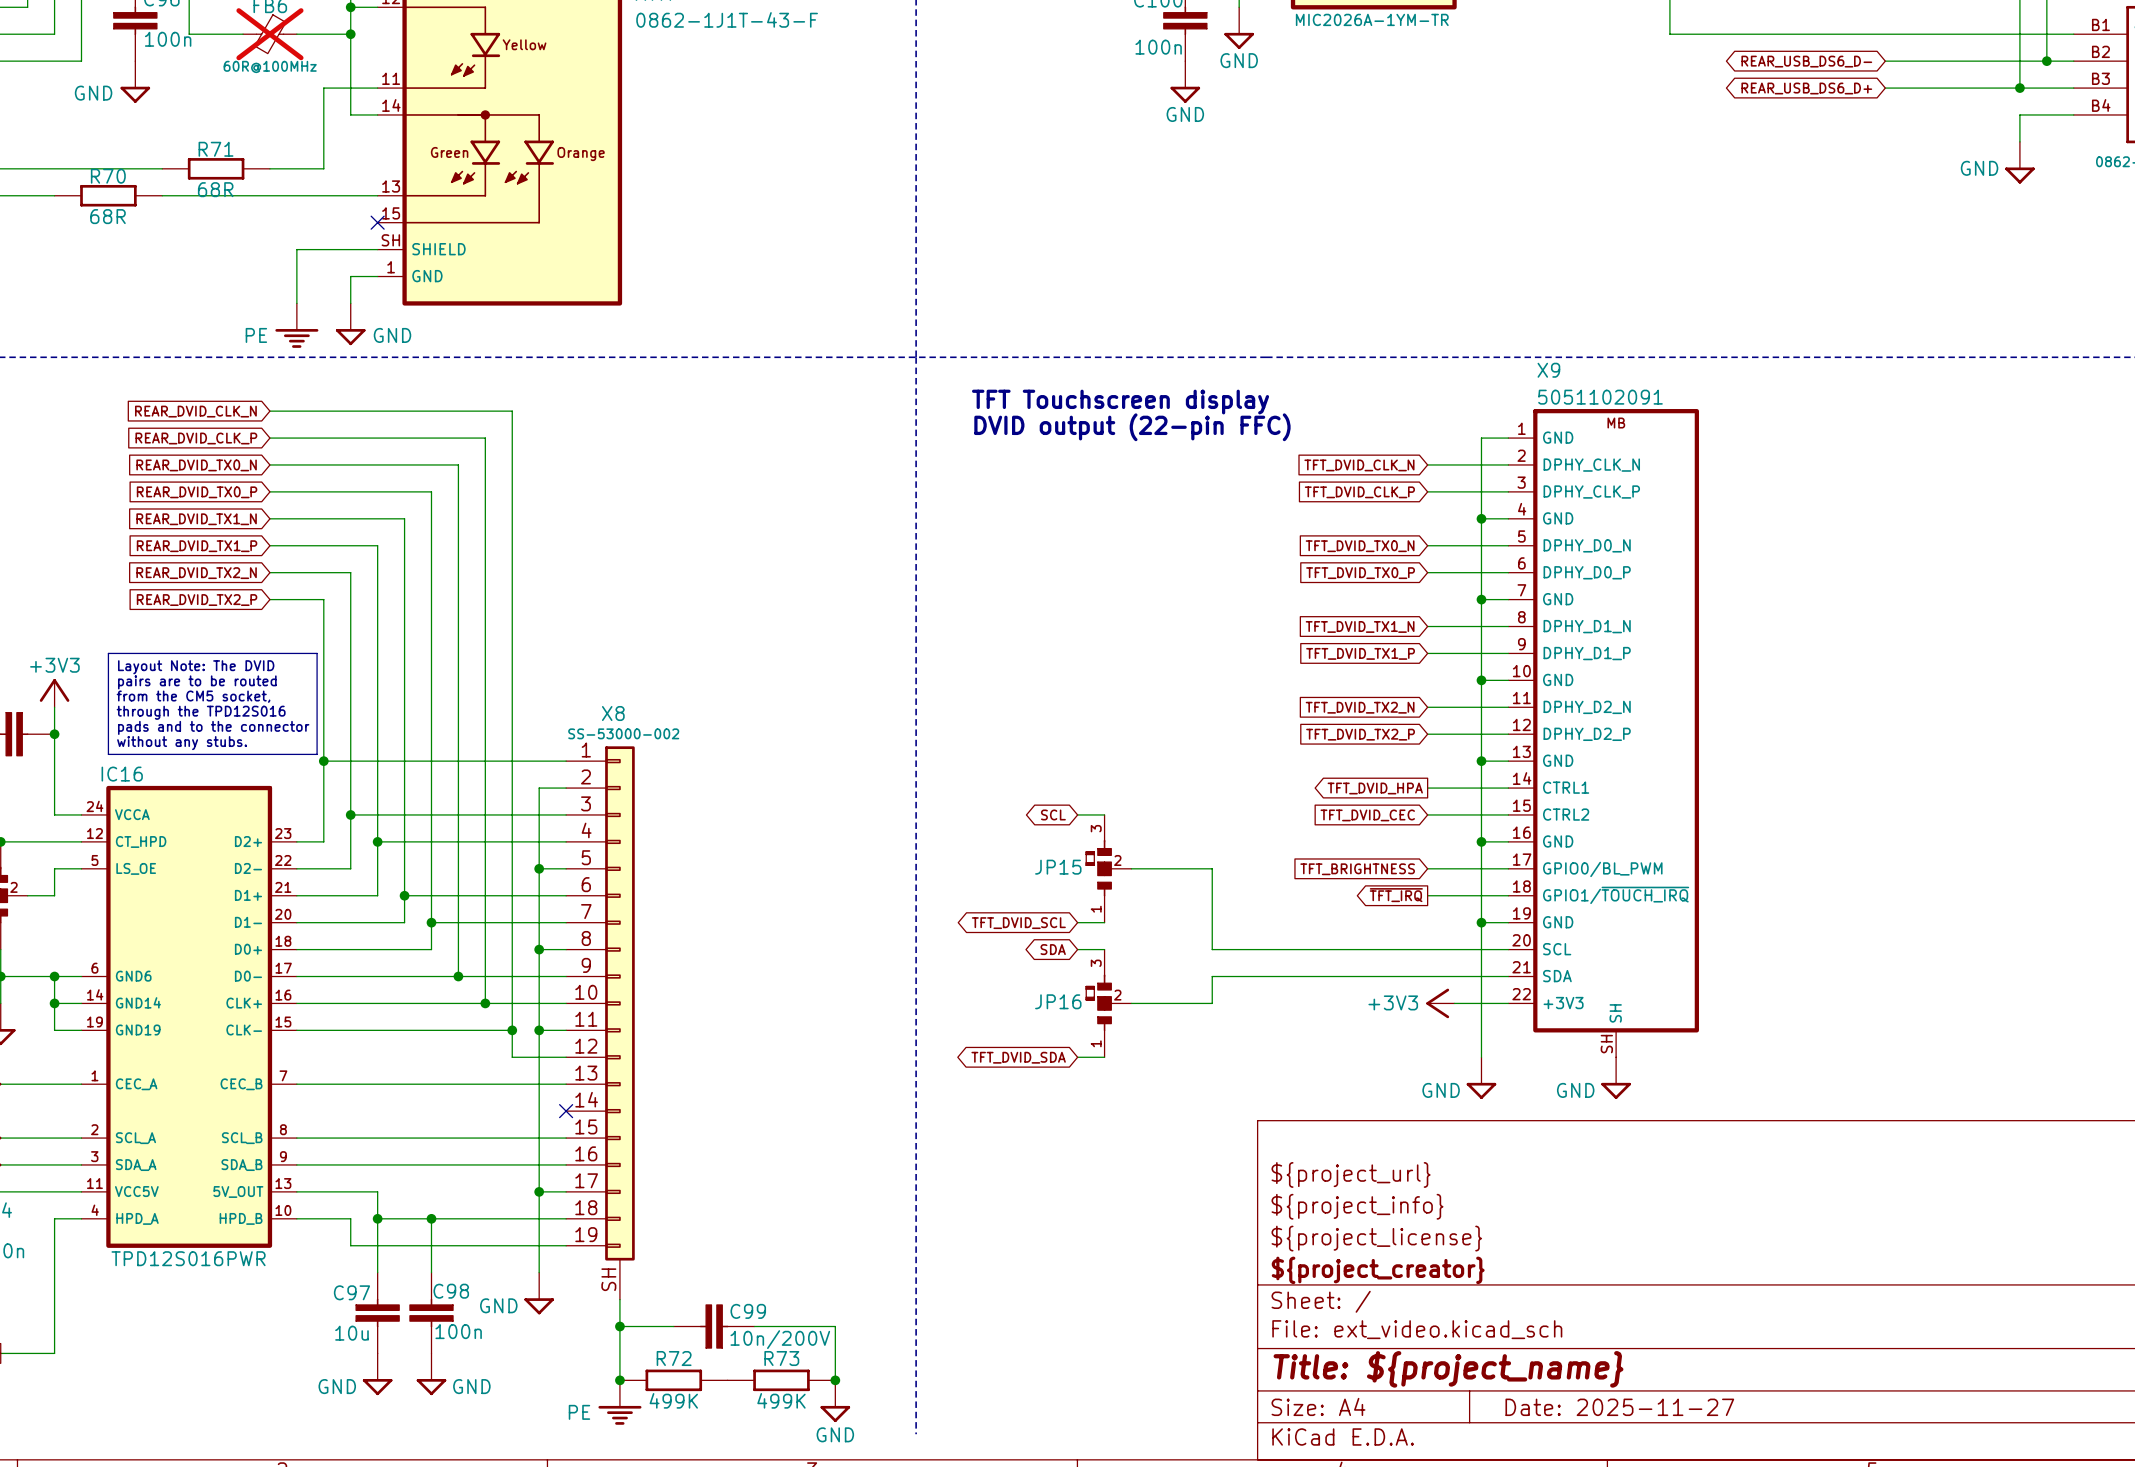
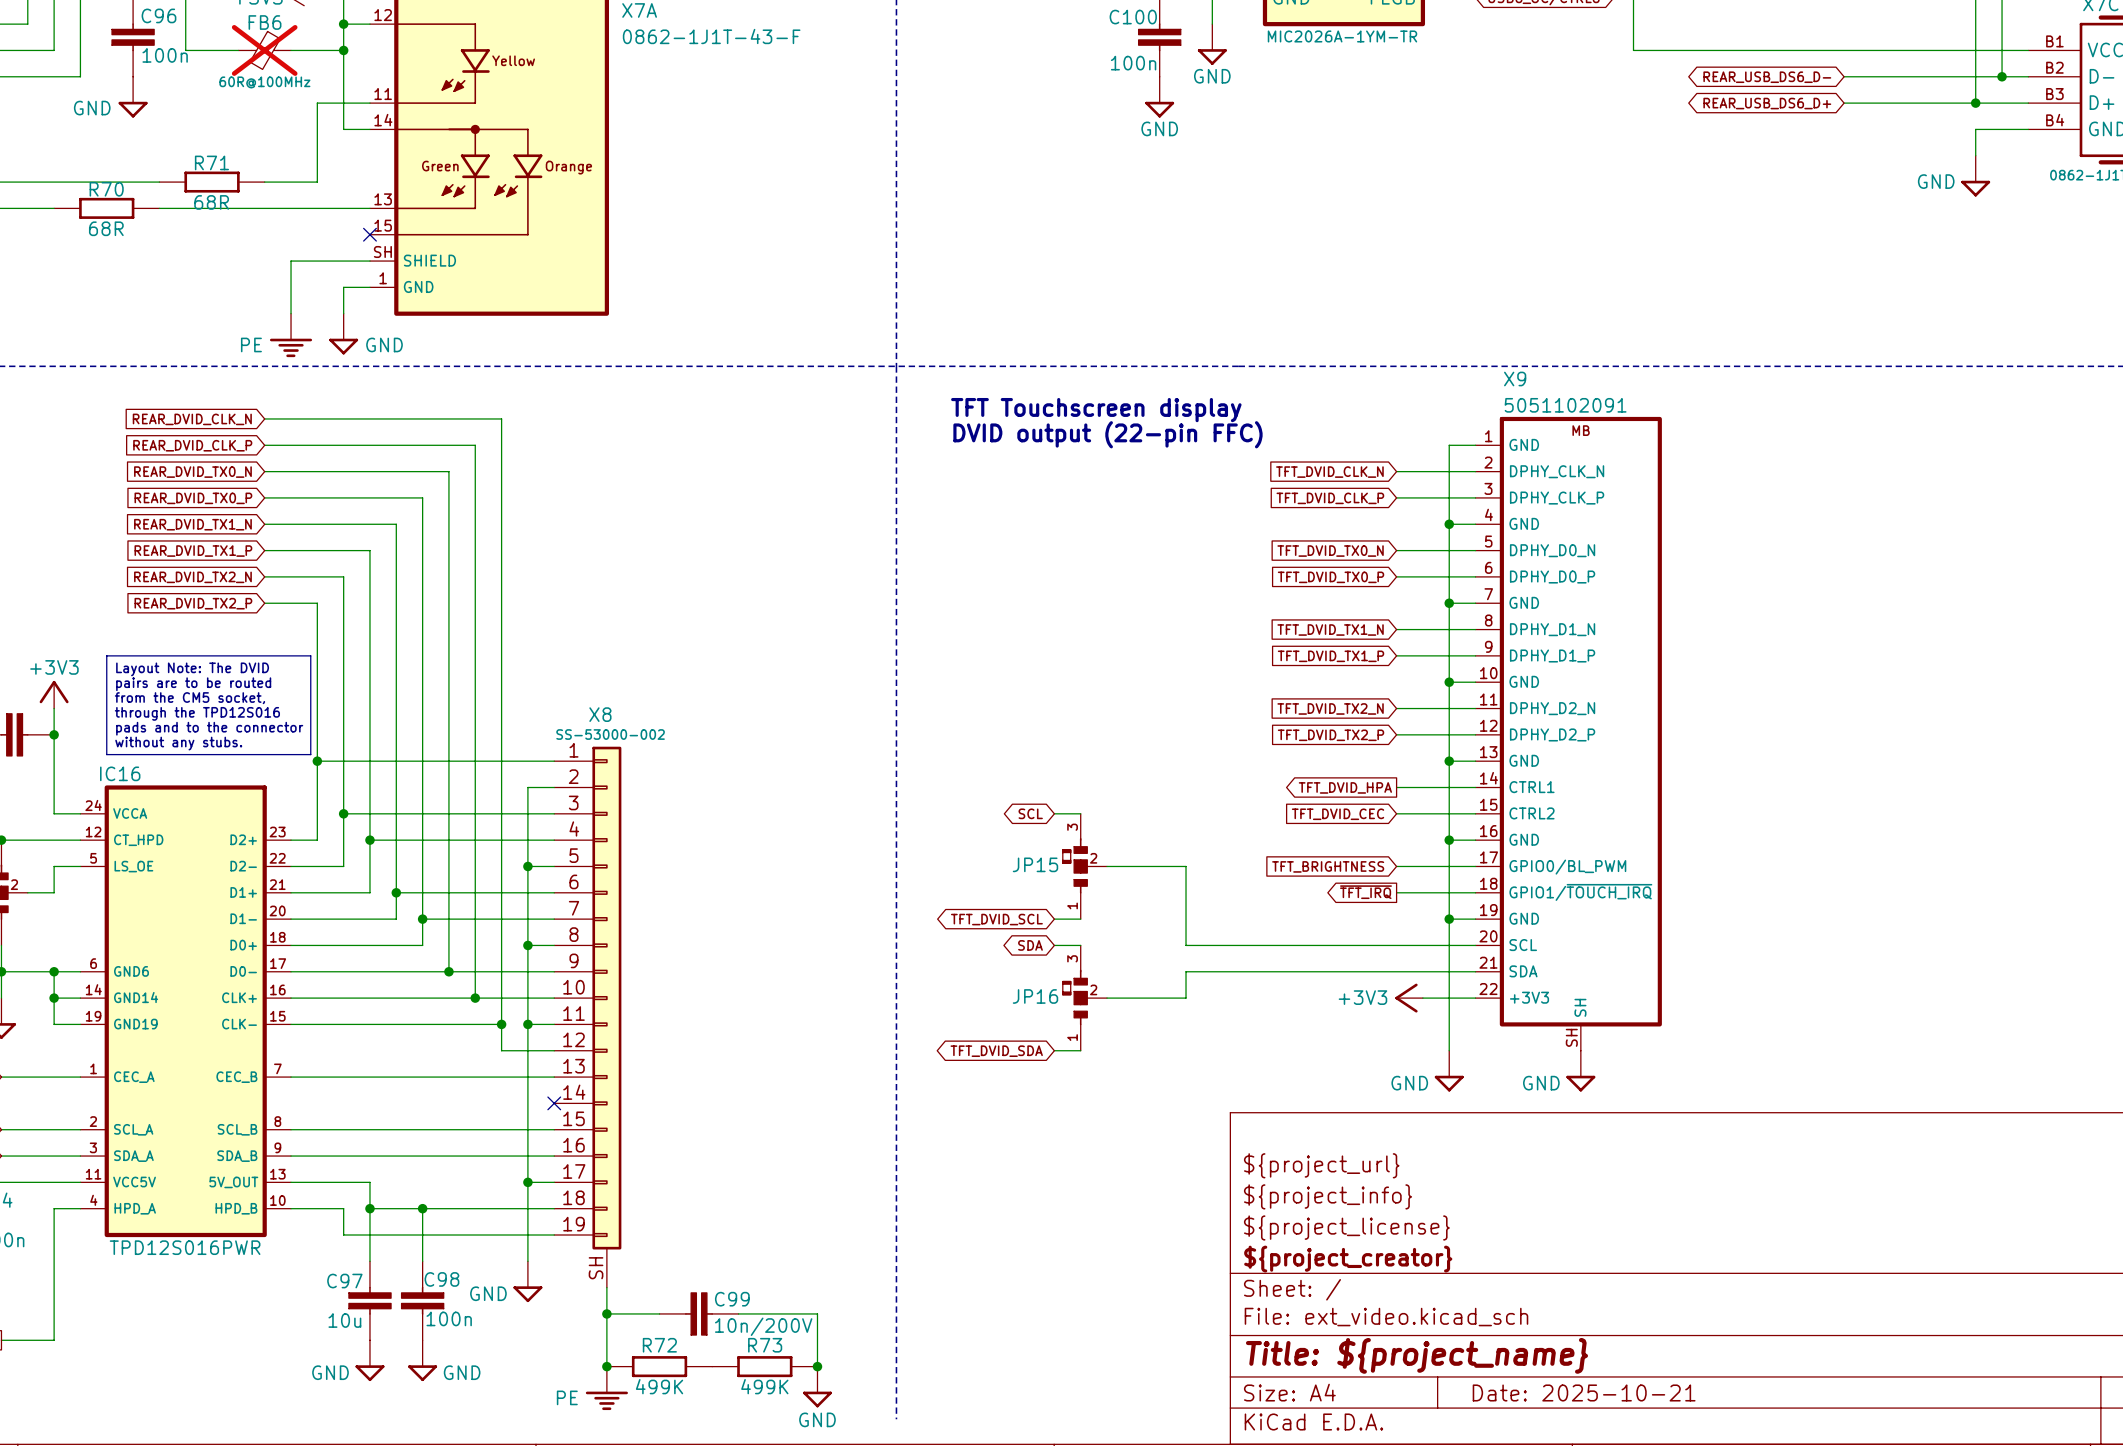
title block: Date: 2025-11-27 (1619, 1407) -> Date: 2025-10-21 (1584, 1392)

